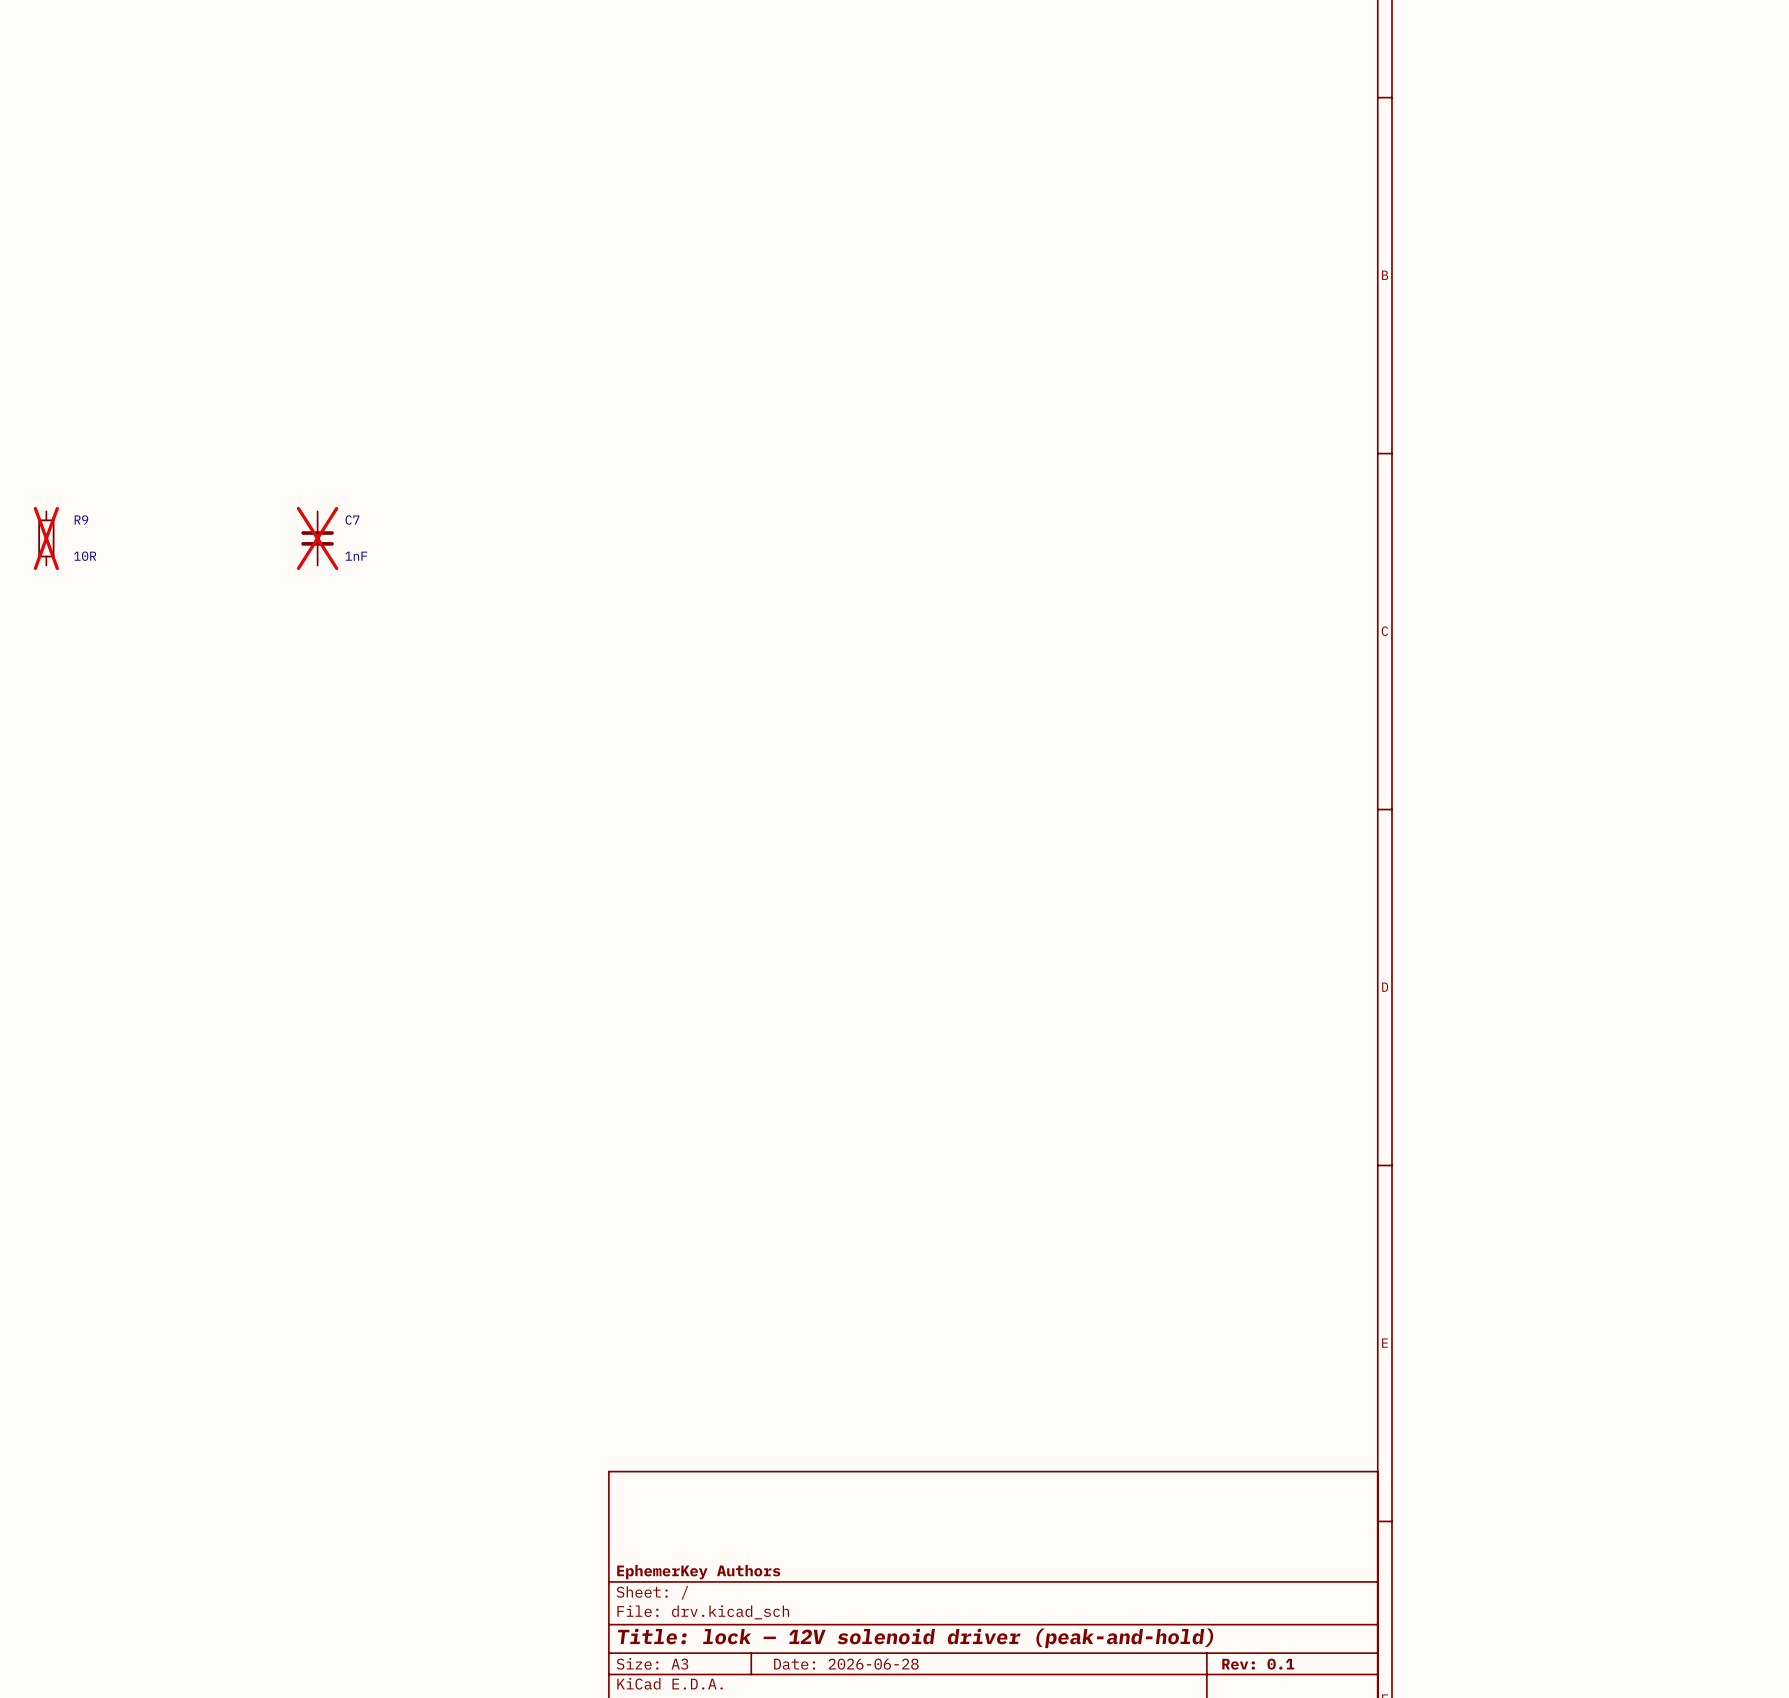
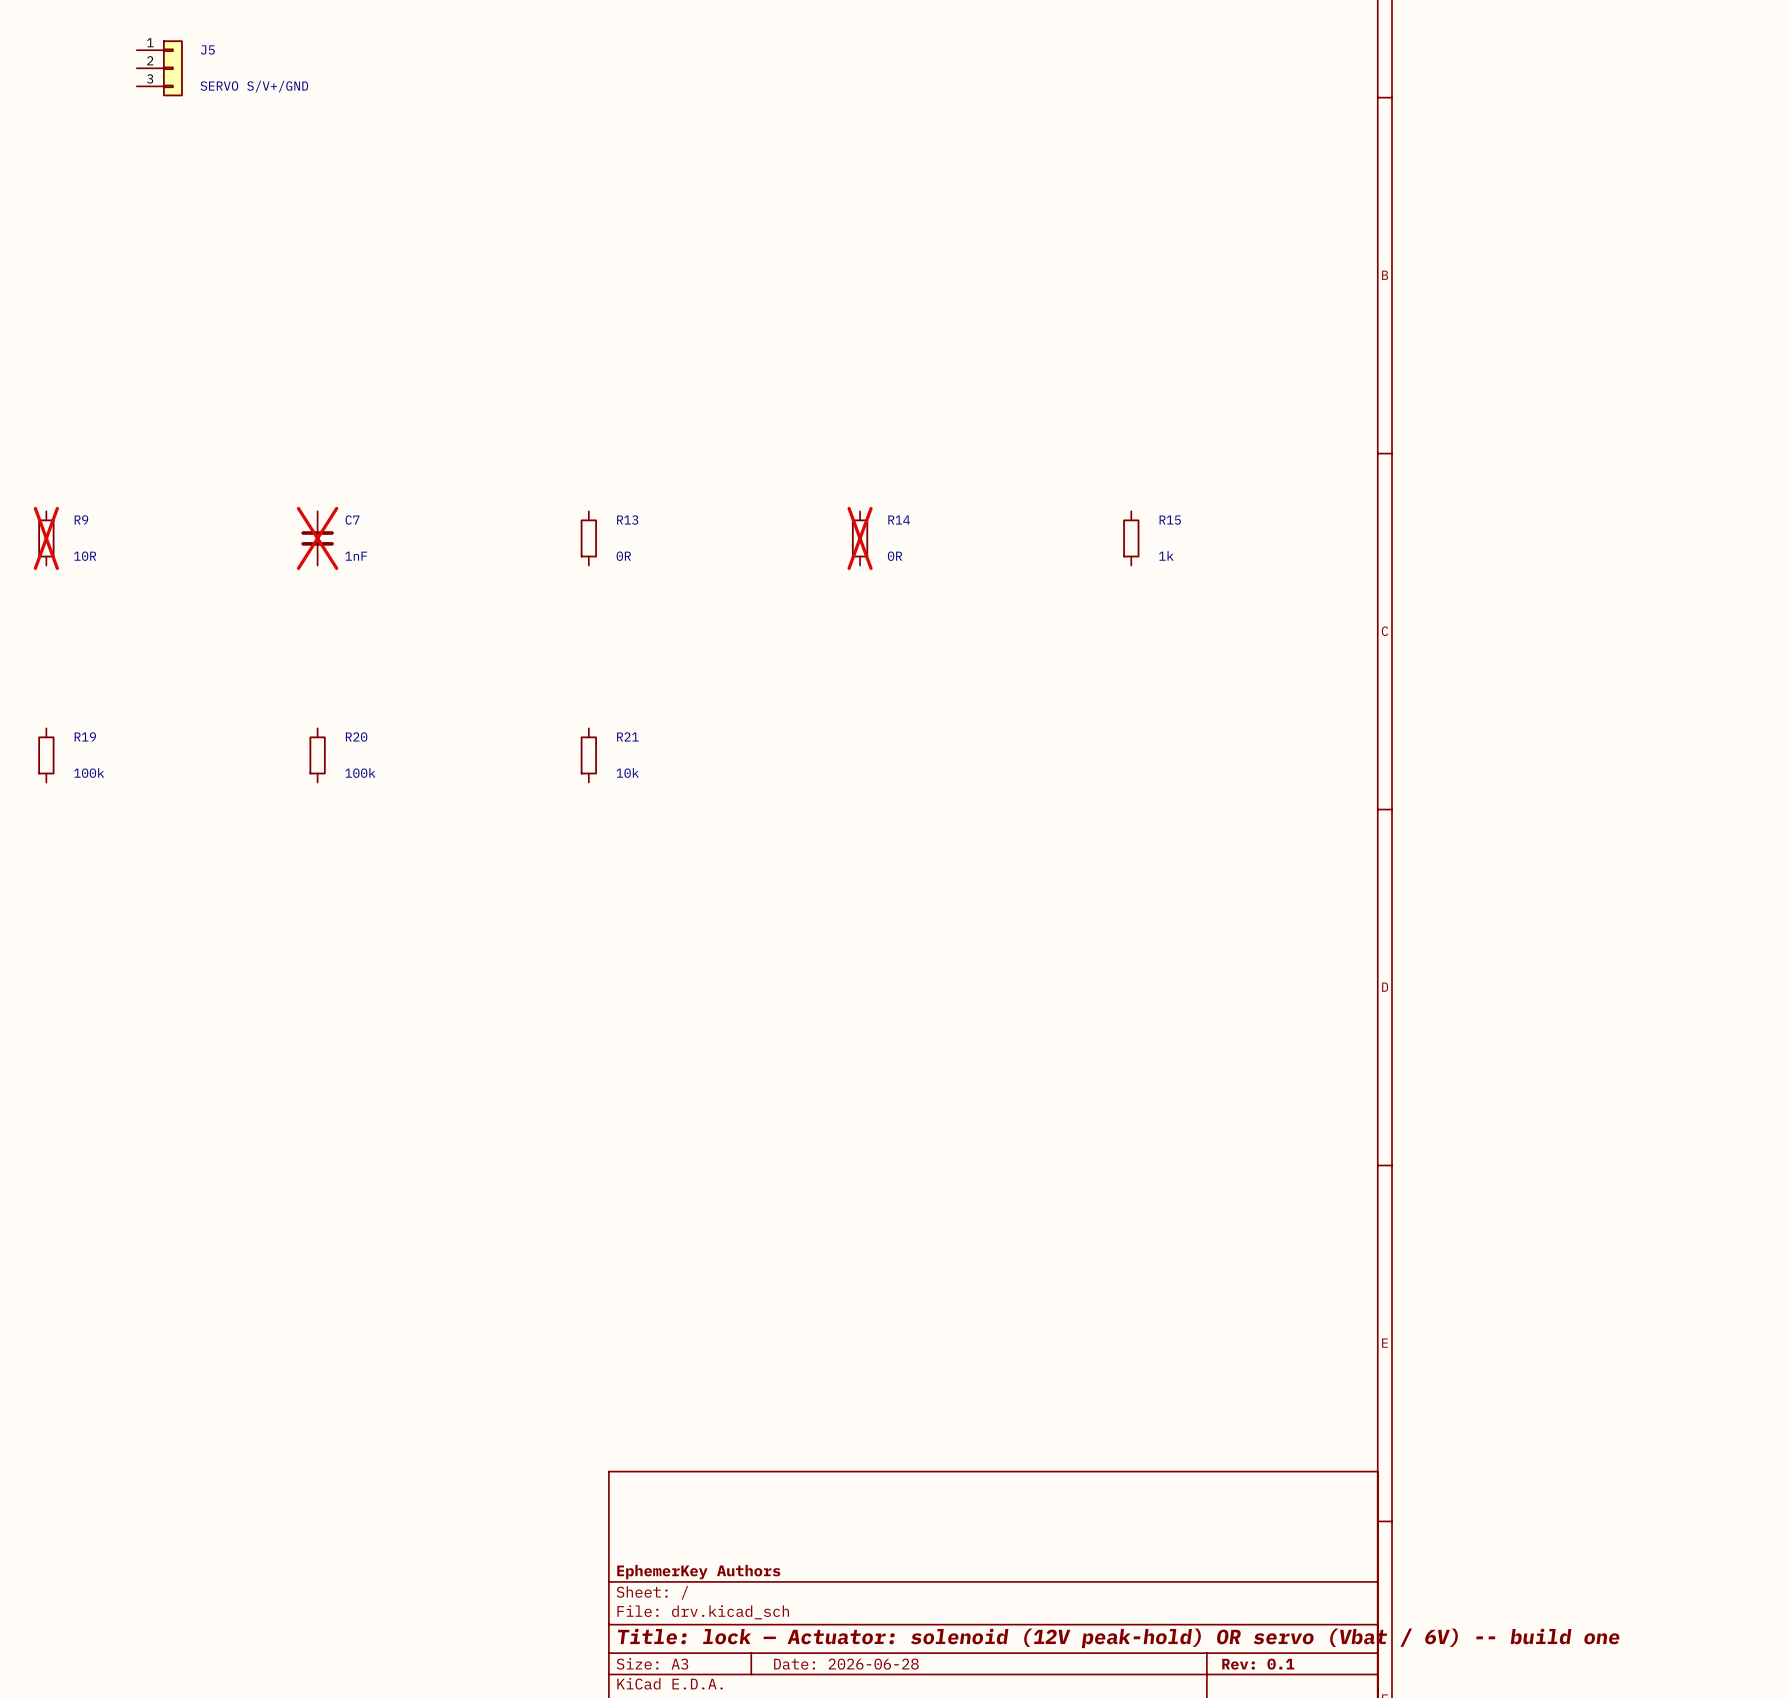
J5: none -> SERVO S/V+/GND (159, 68)
R13: none -> 0R (588, 538)
R14: none -> 0R (860, 538)
R15: none -> 1k (1131, 538)
R19: none -> 100k (46, 755)
R20: none -> 100k (317, 755)
R21: none -> 10k (588, 755)
title block: Title: lock — 12V solenoid driver (peak-and-hold) (915, 1638) -> Title: lock — Actuator: solenoid (12V peak-hold) OR servo (Vbat / 6V) -- build one (1118, 1638)

